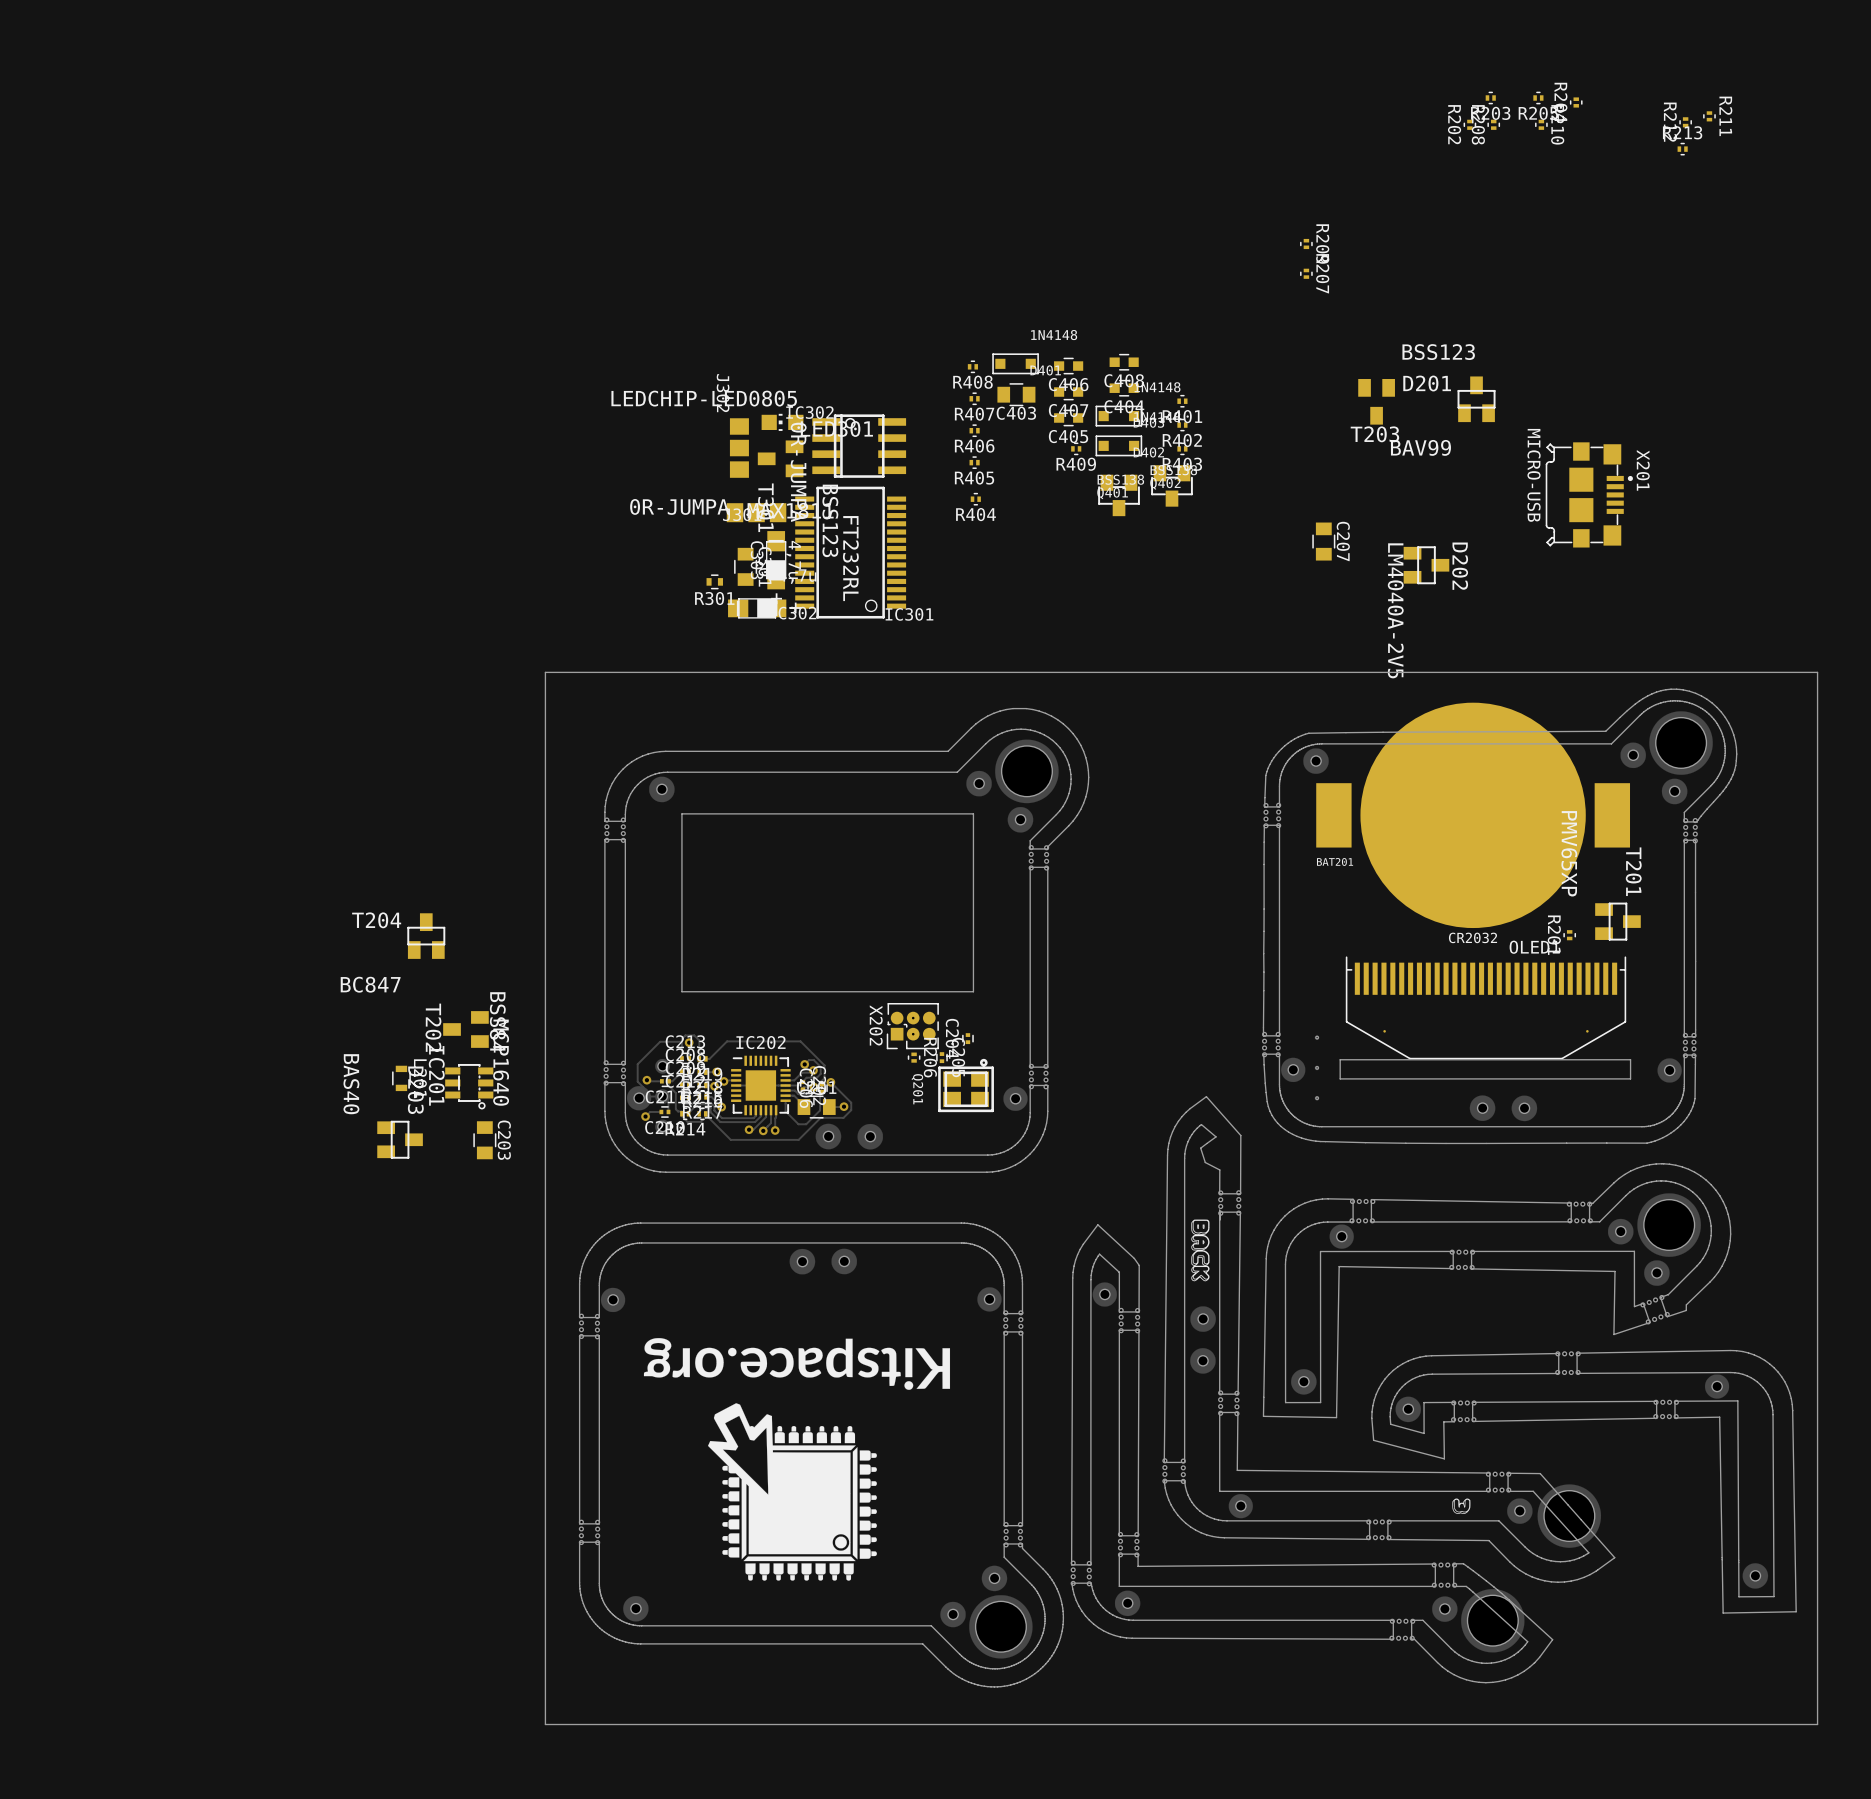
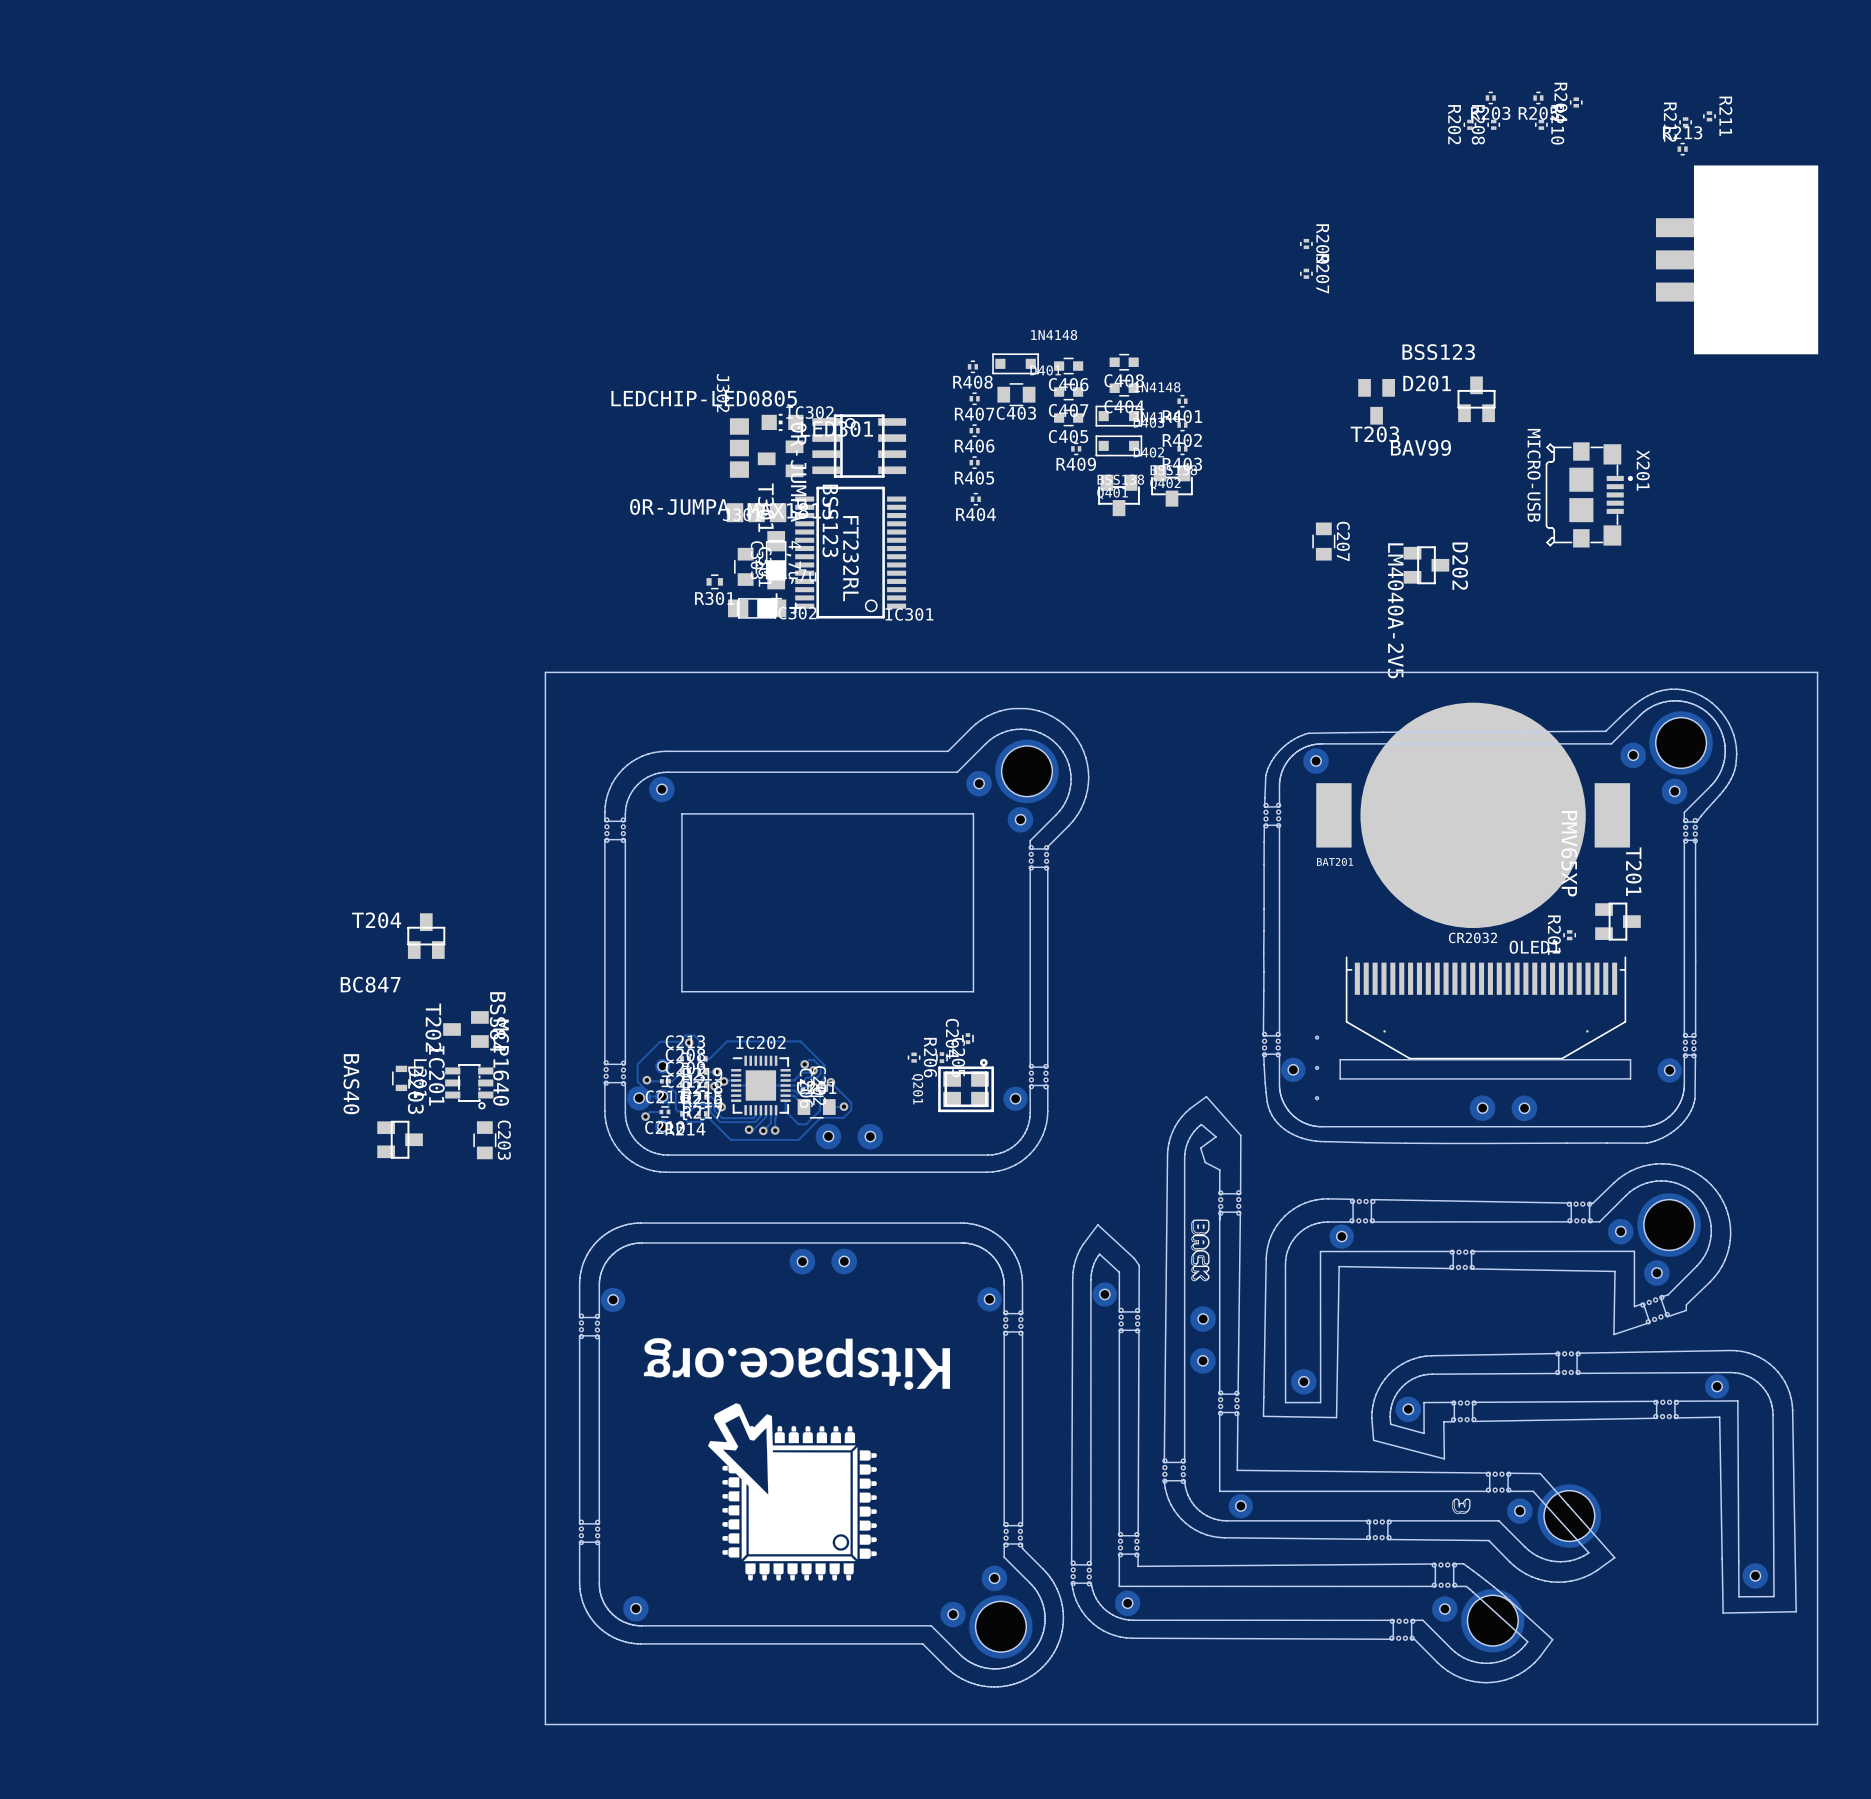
part: none -> (1737, 259)
X202: (912, 1026) -> none

